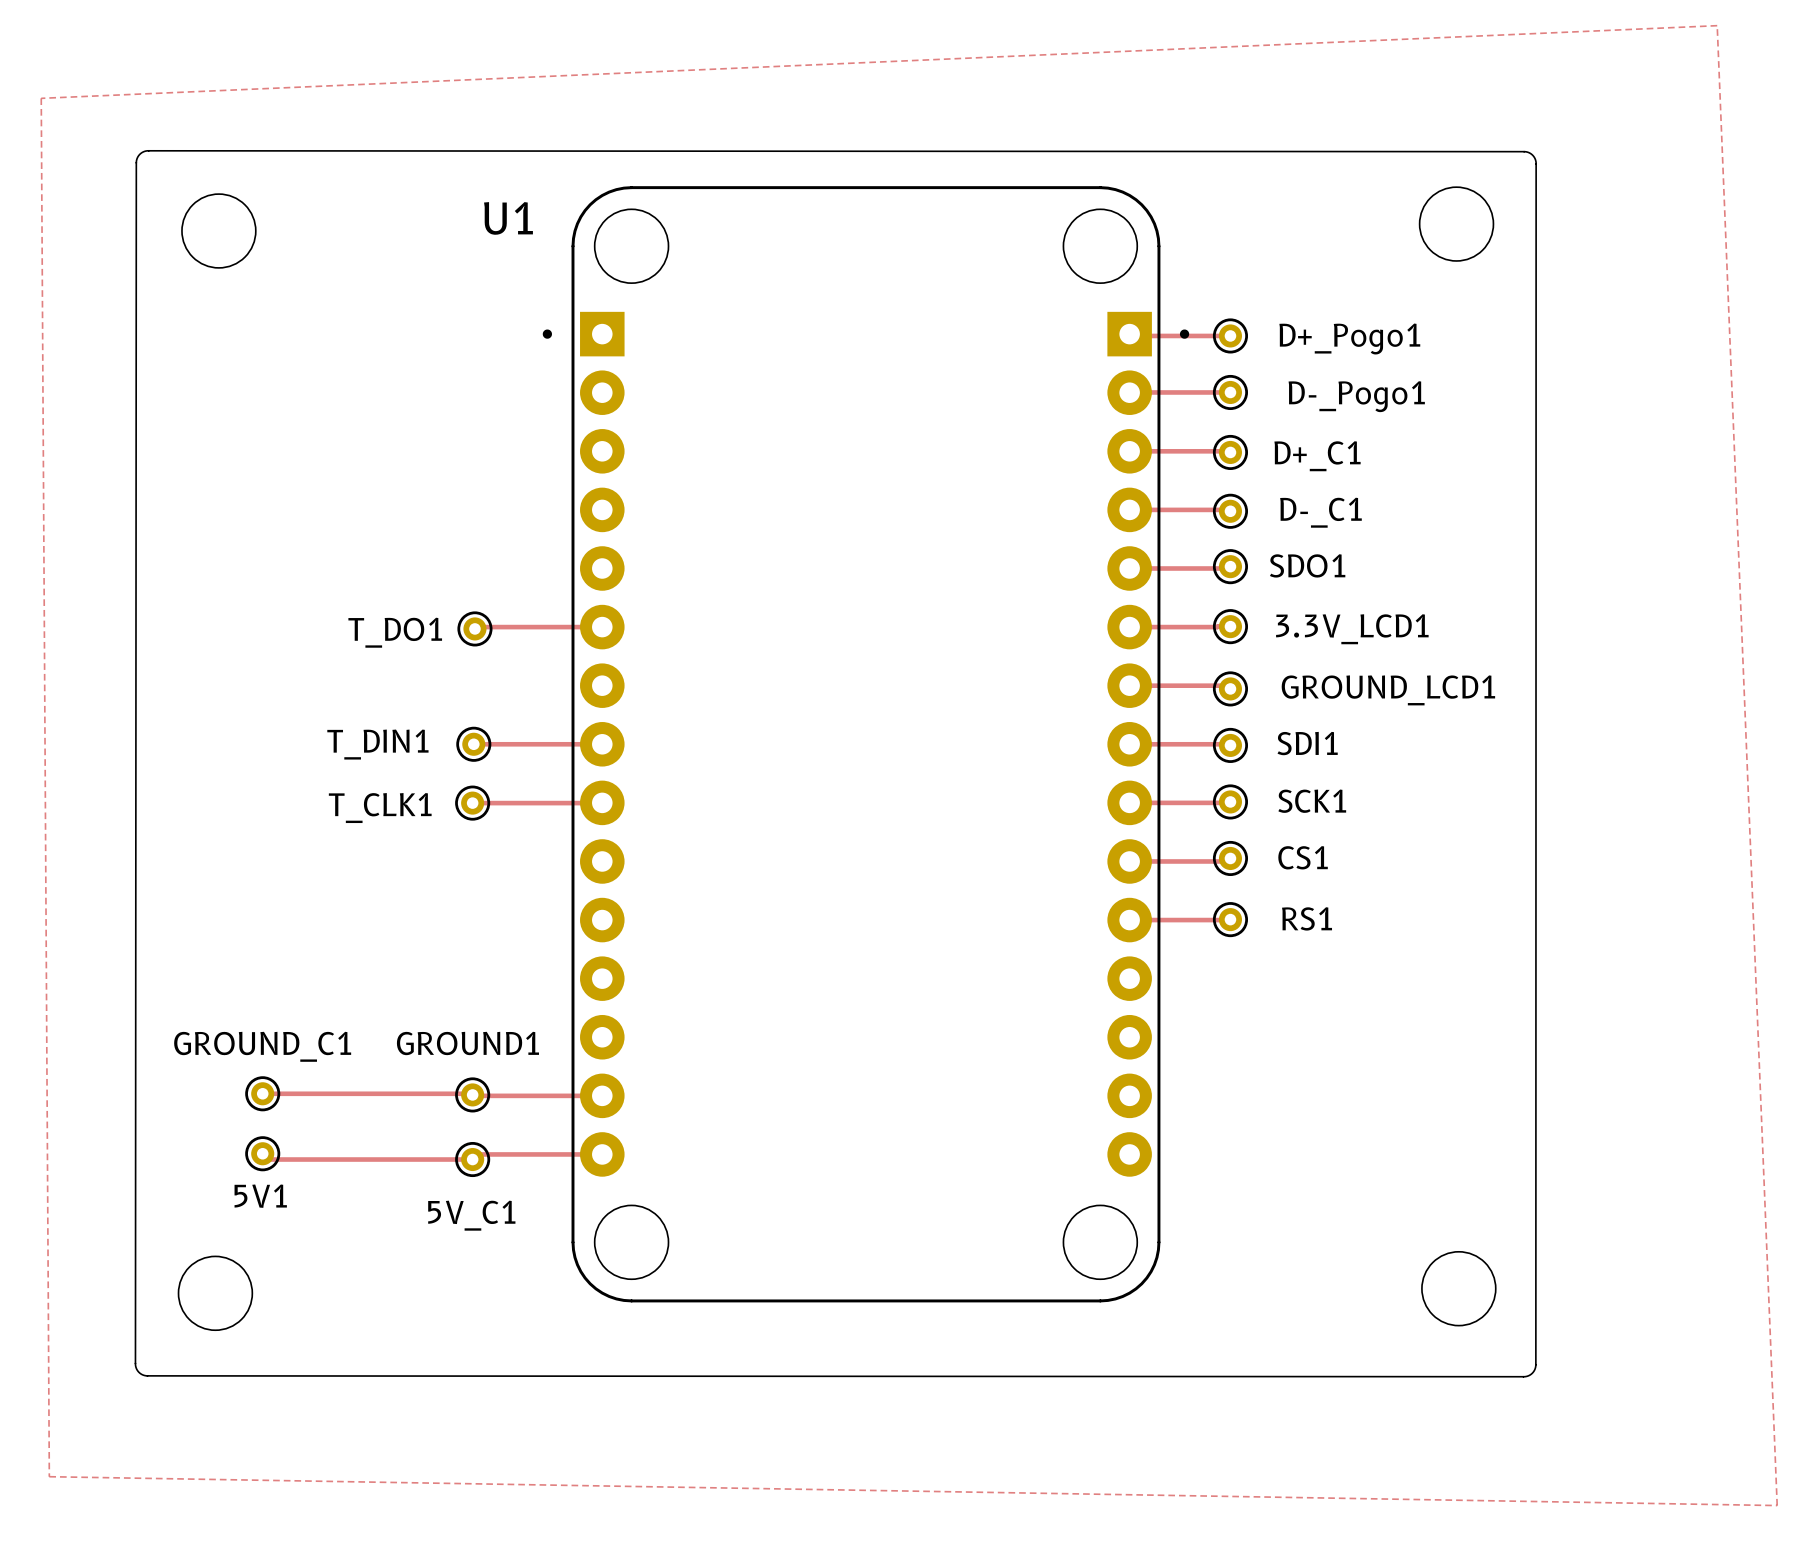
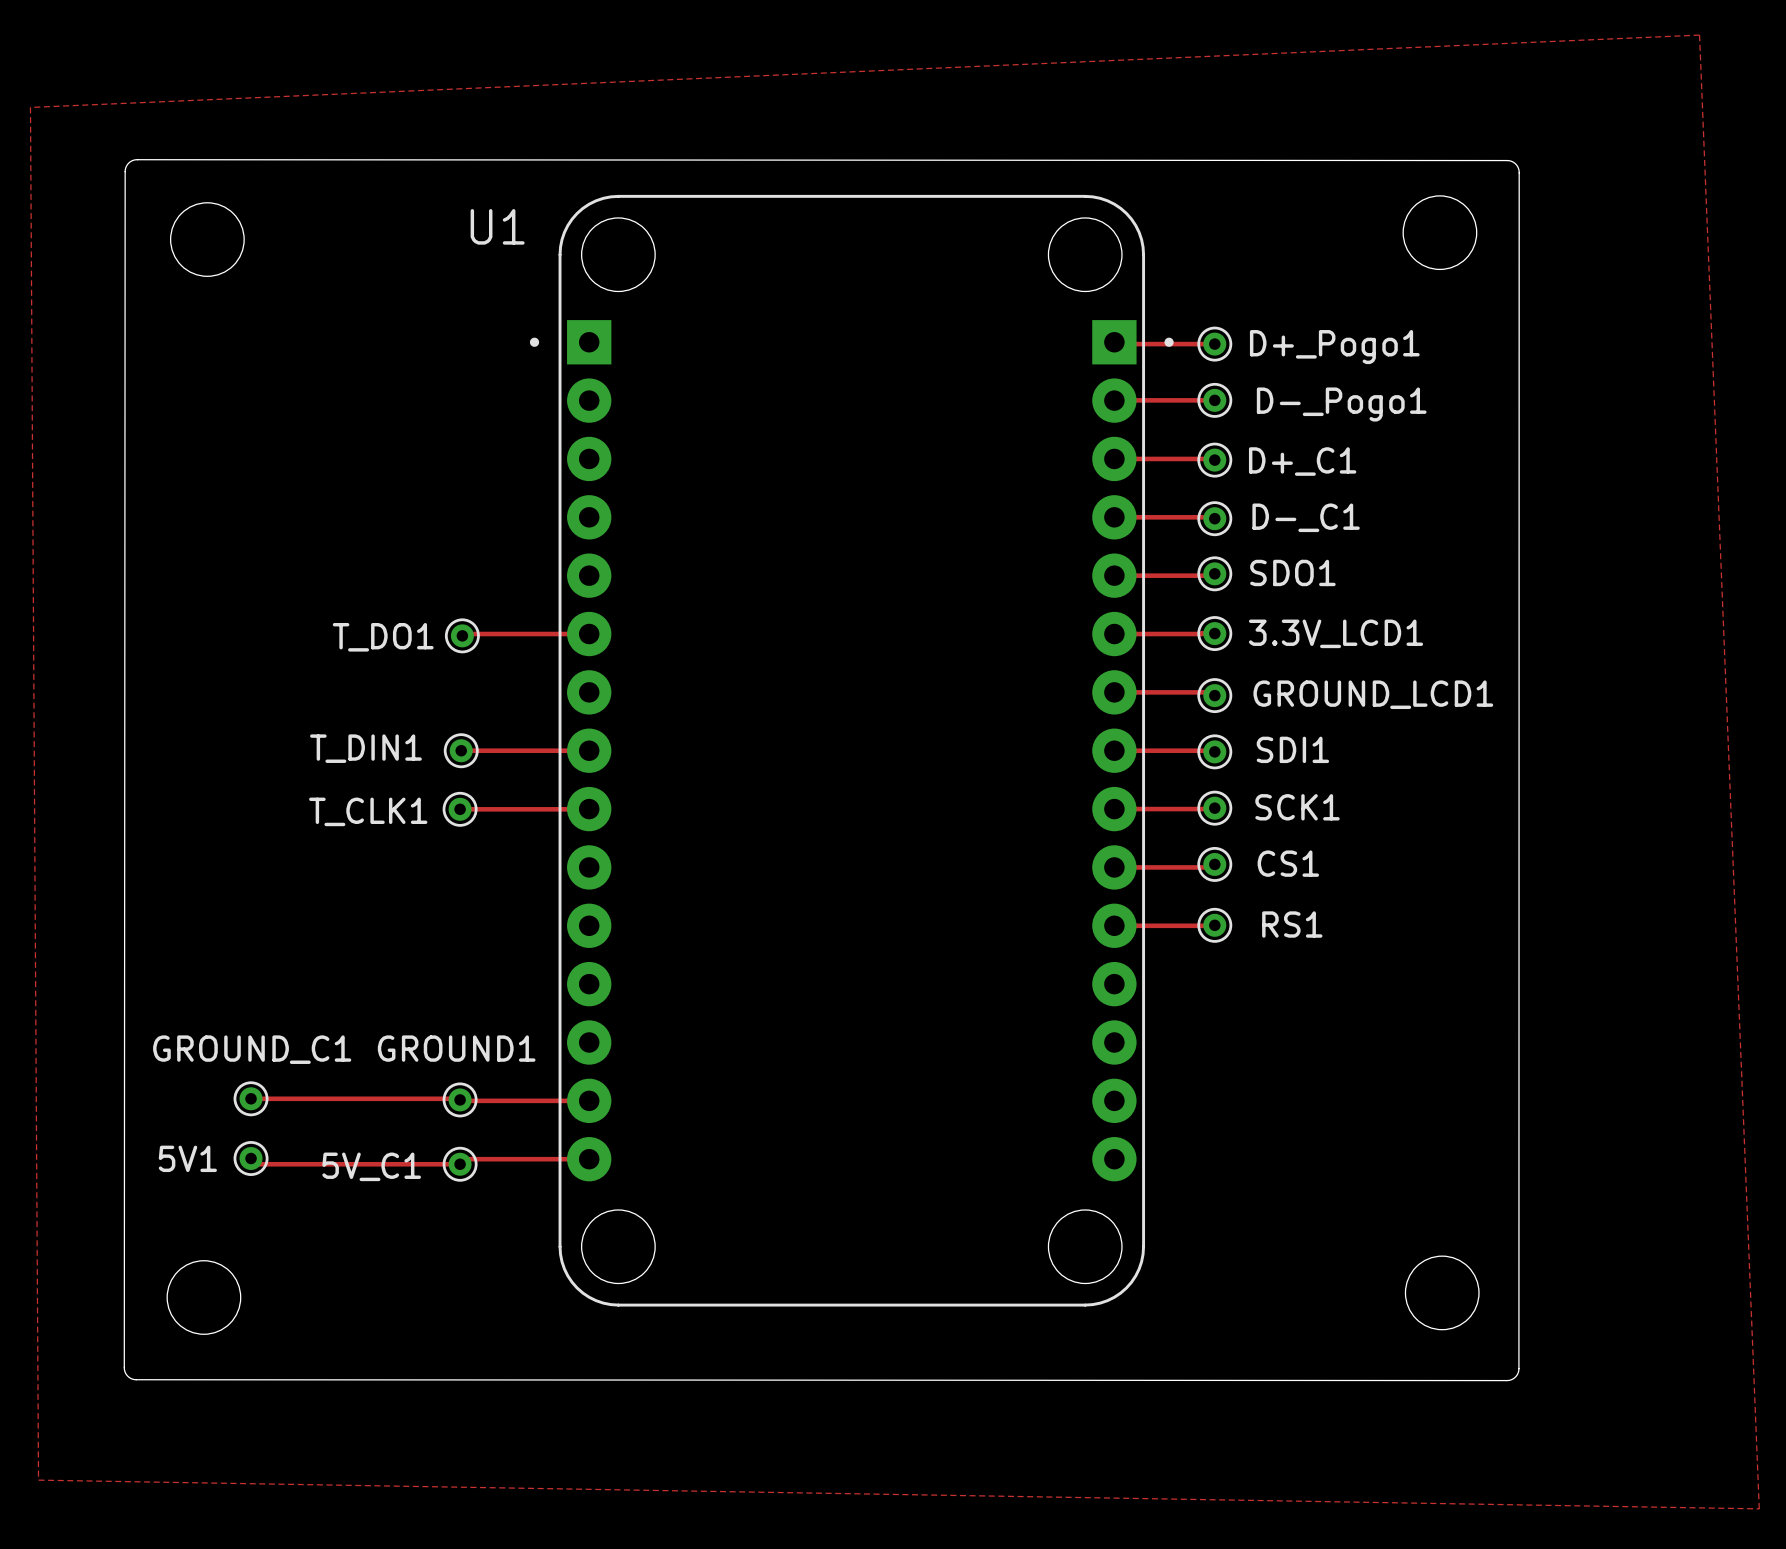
5V1 name position: 5V1 (260, 1196) -> 5V1 (187, 1158)
5V_C1 name position: 5V_C1 (471, 1215) -> 5V_C1 (371, 1166)

